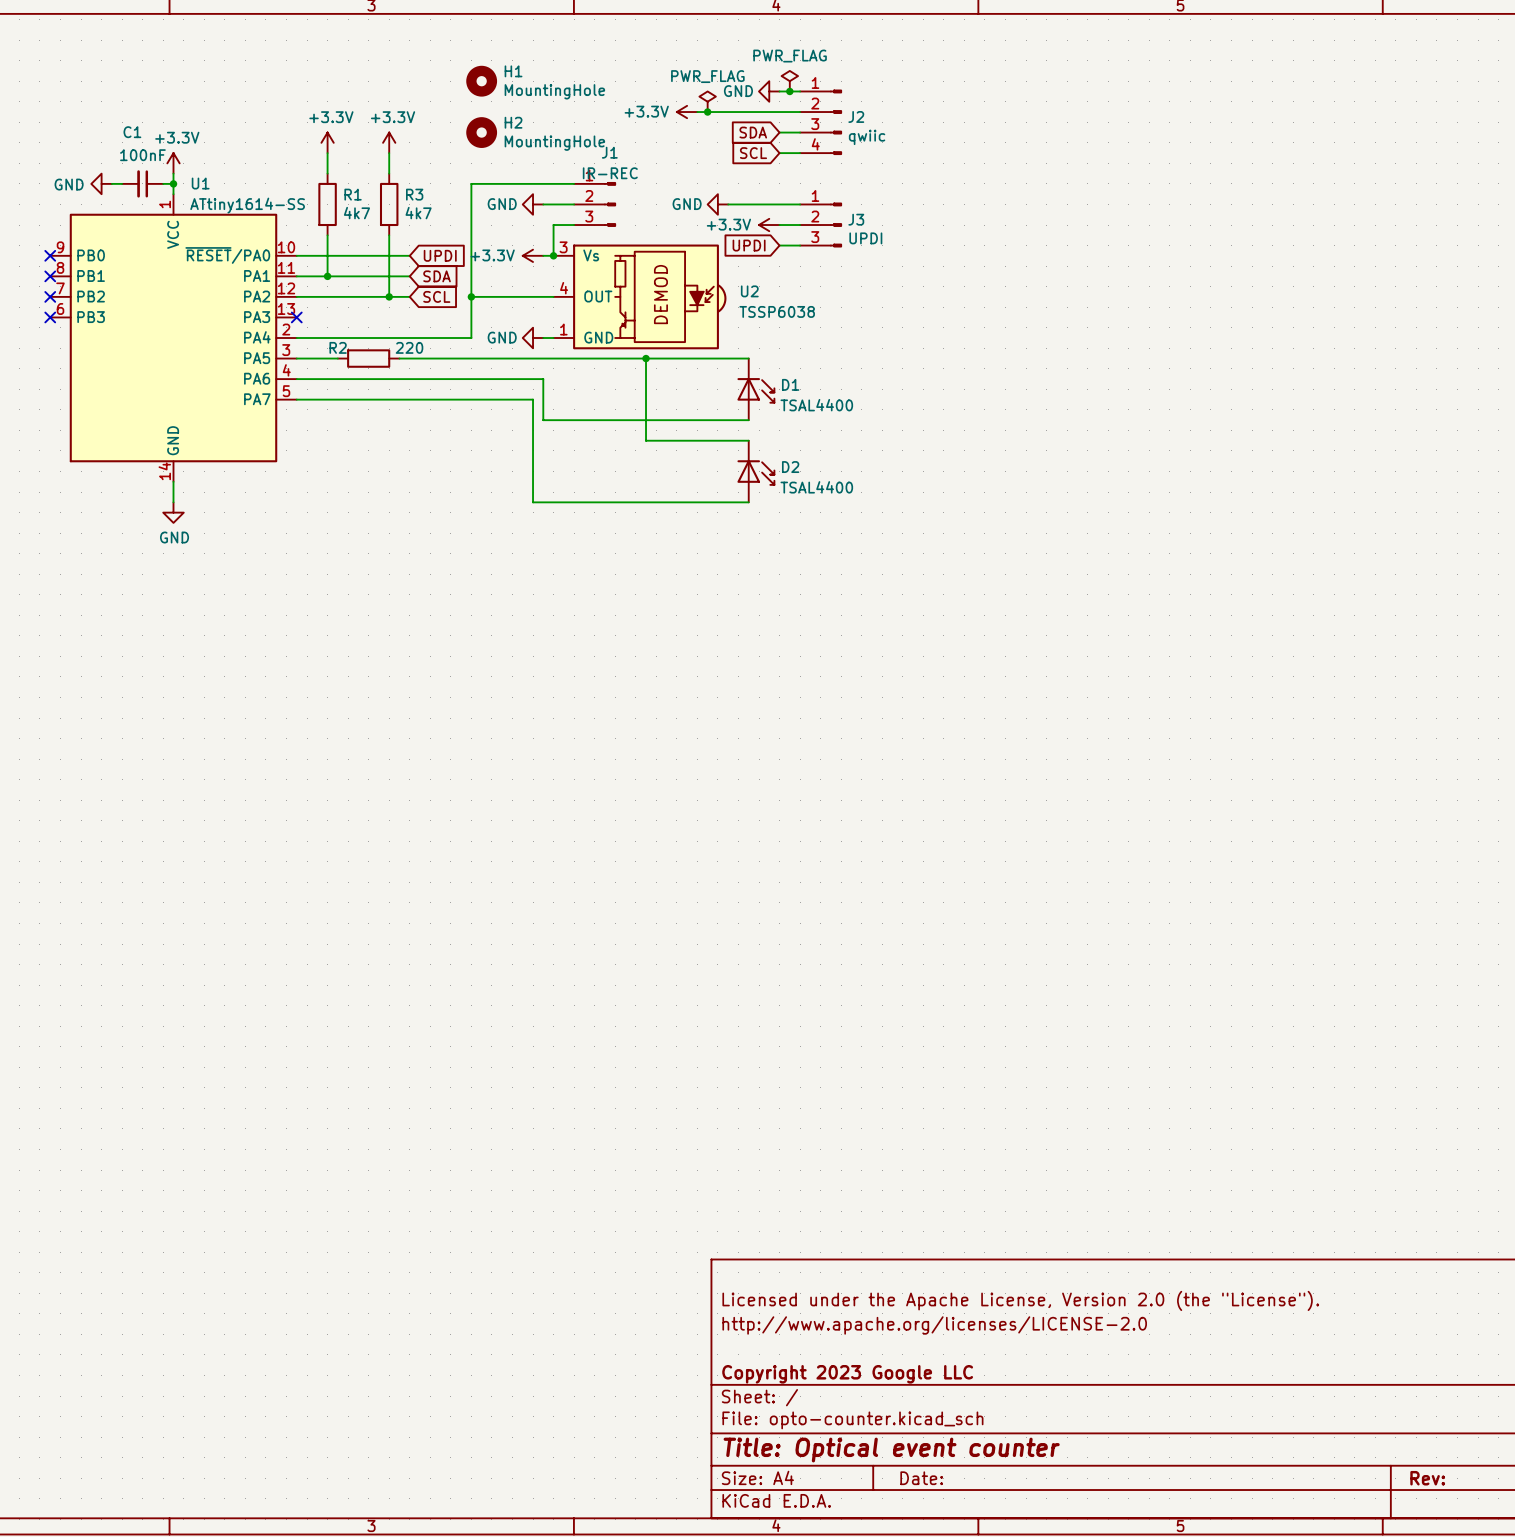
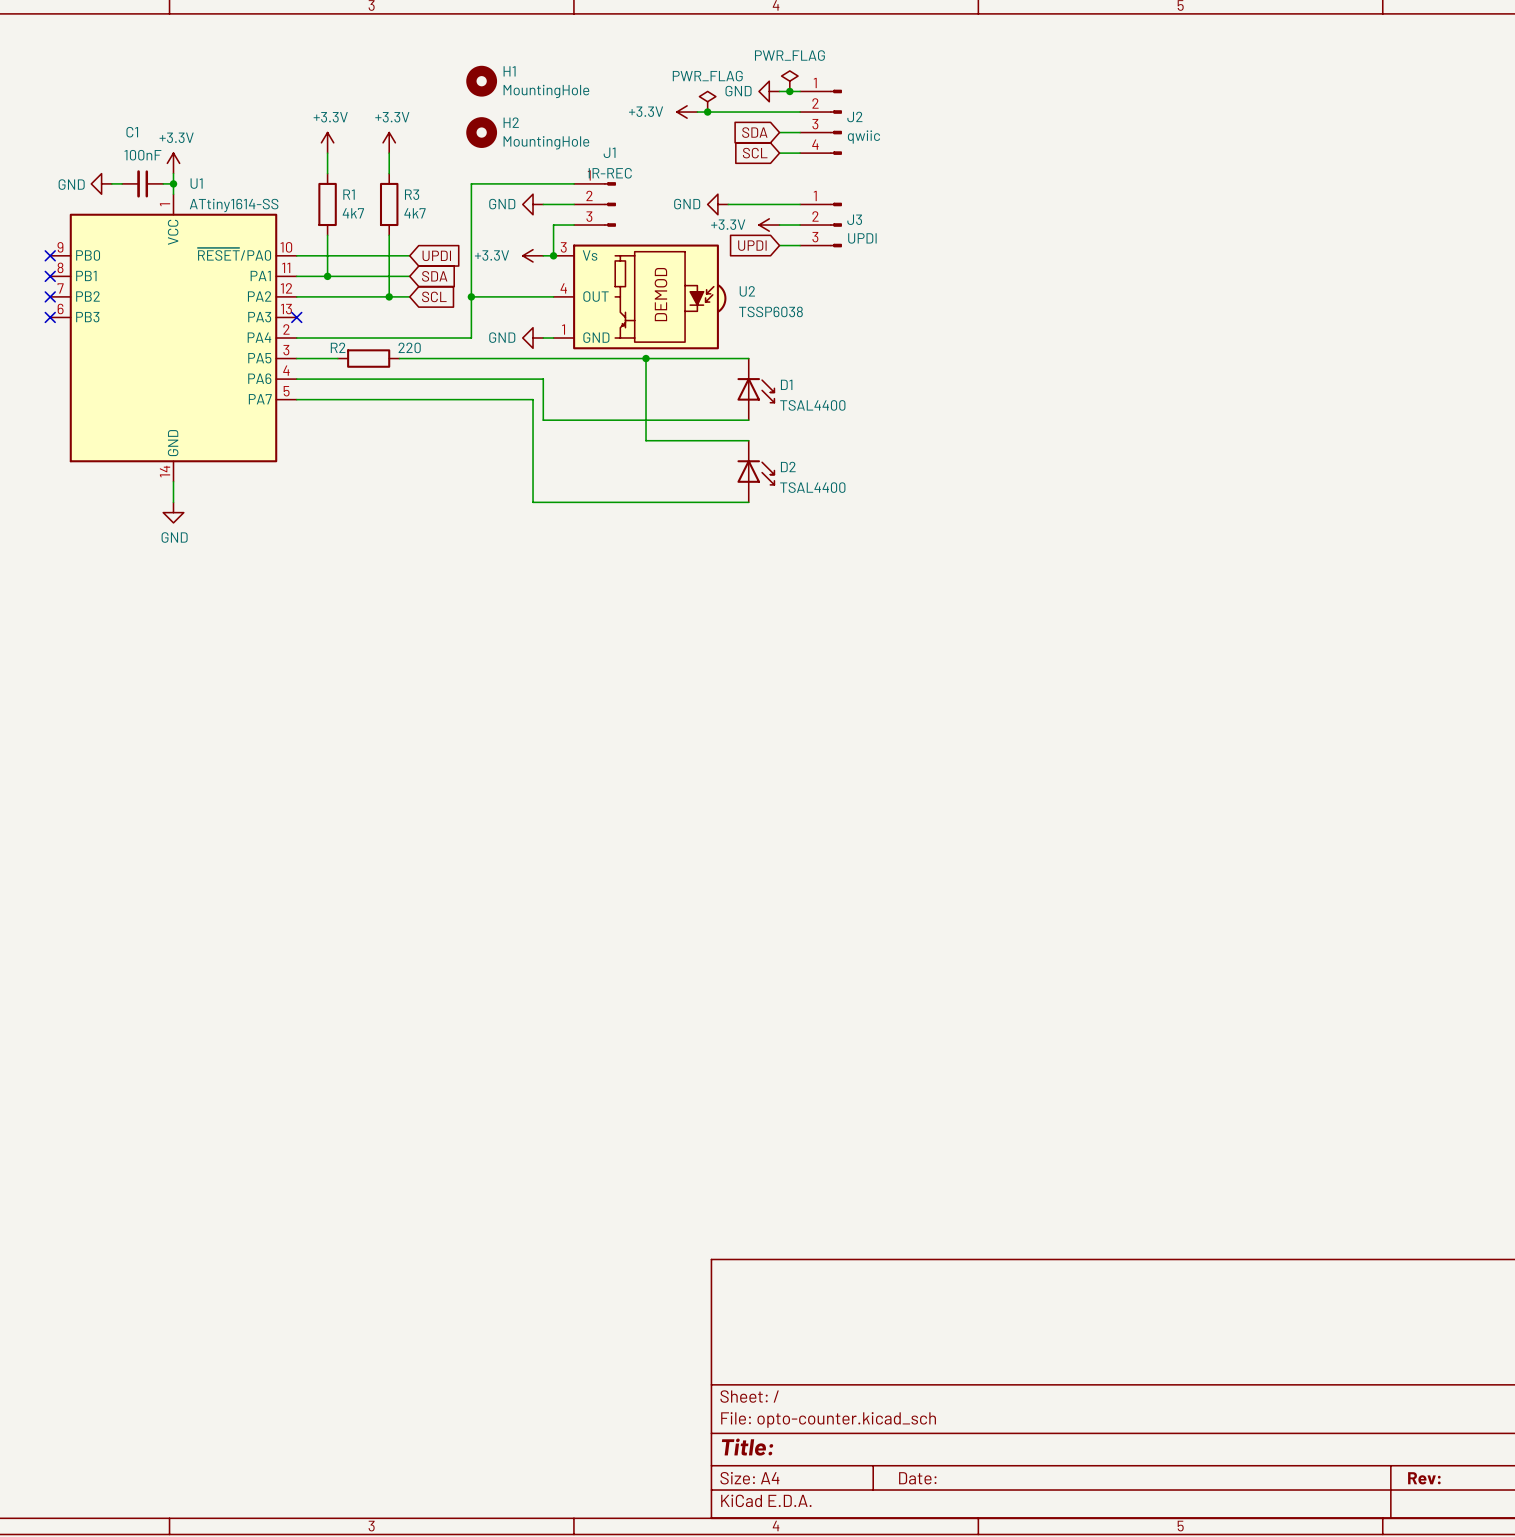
title block: Licensed under the Apache License, Version 2.0 (the "License"). (1020, 1300) -> none
title block: http://www.apache.org/licenses/LICENSE-2.0 (934, 1325) -> none
title block: Copyright 2023 Google LLC (847, 1374) -> none
title block: Title: Optical event counter (891, 1450) -> Title: (747, 1447)

